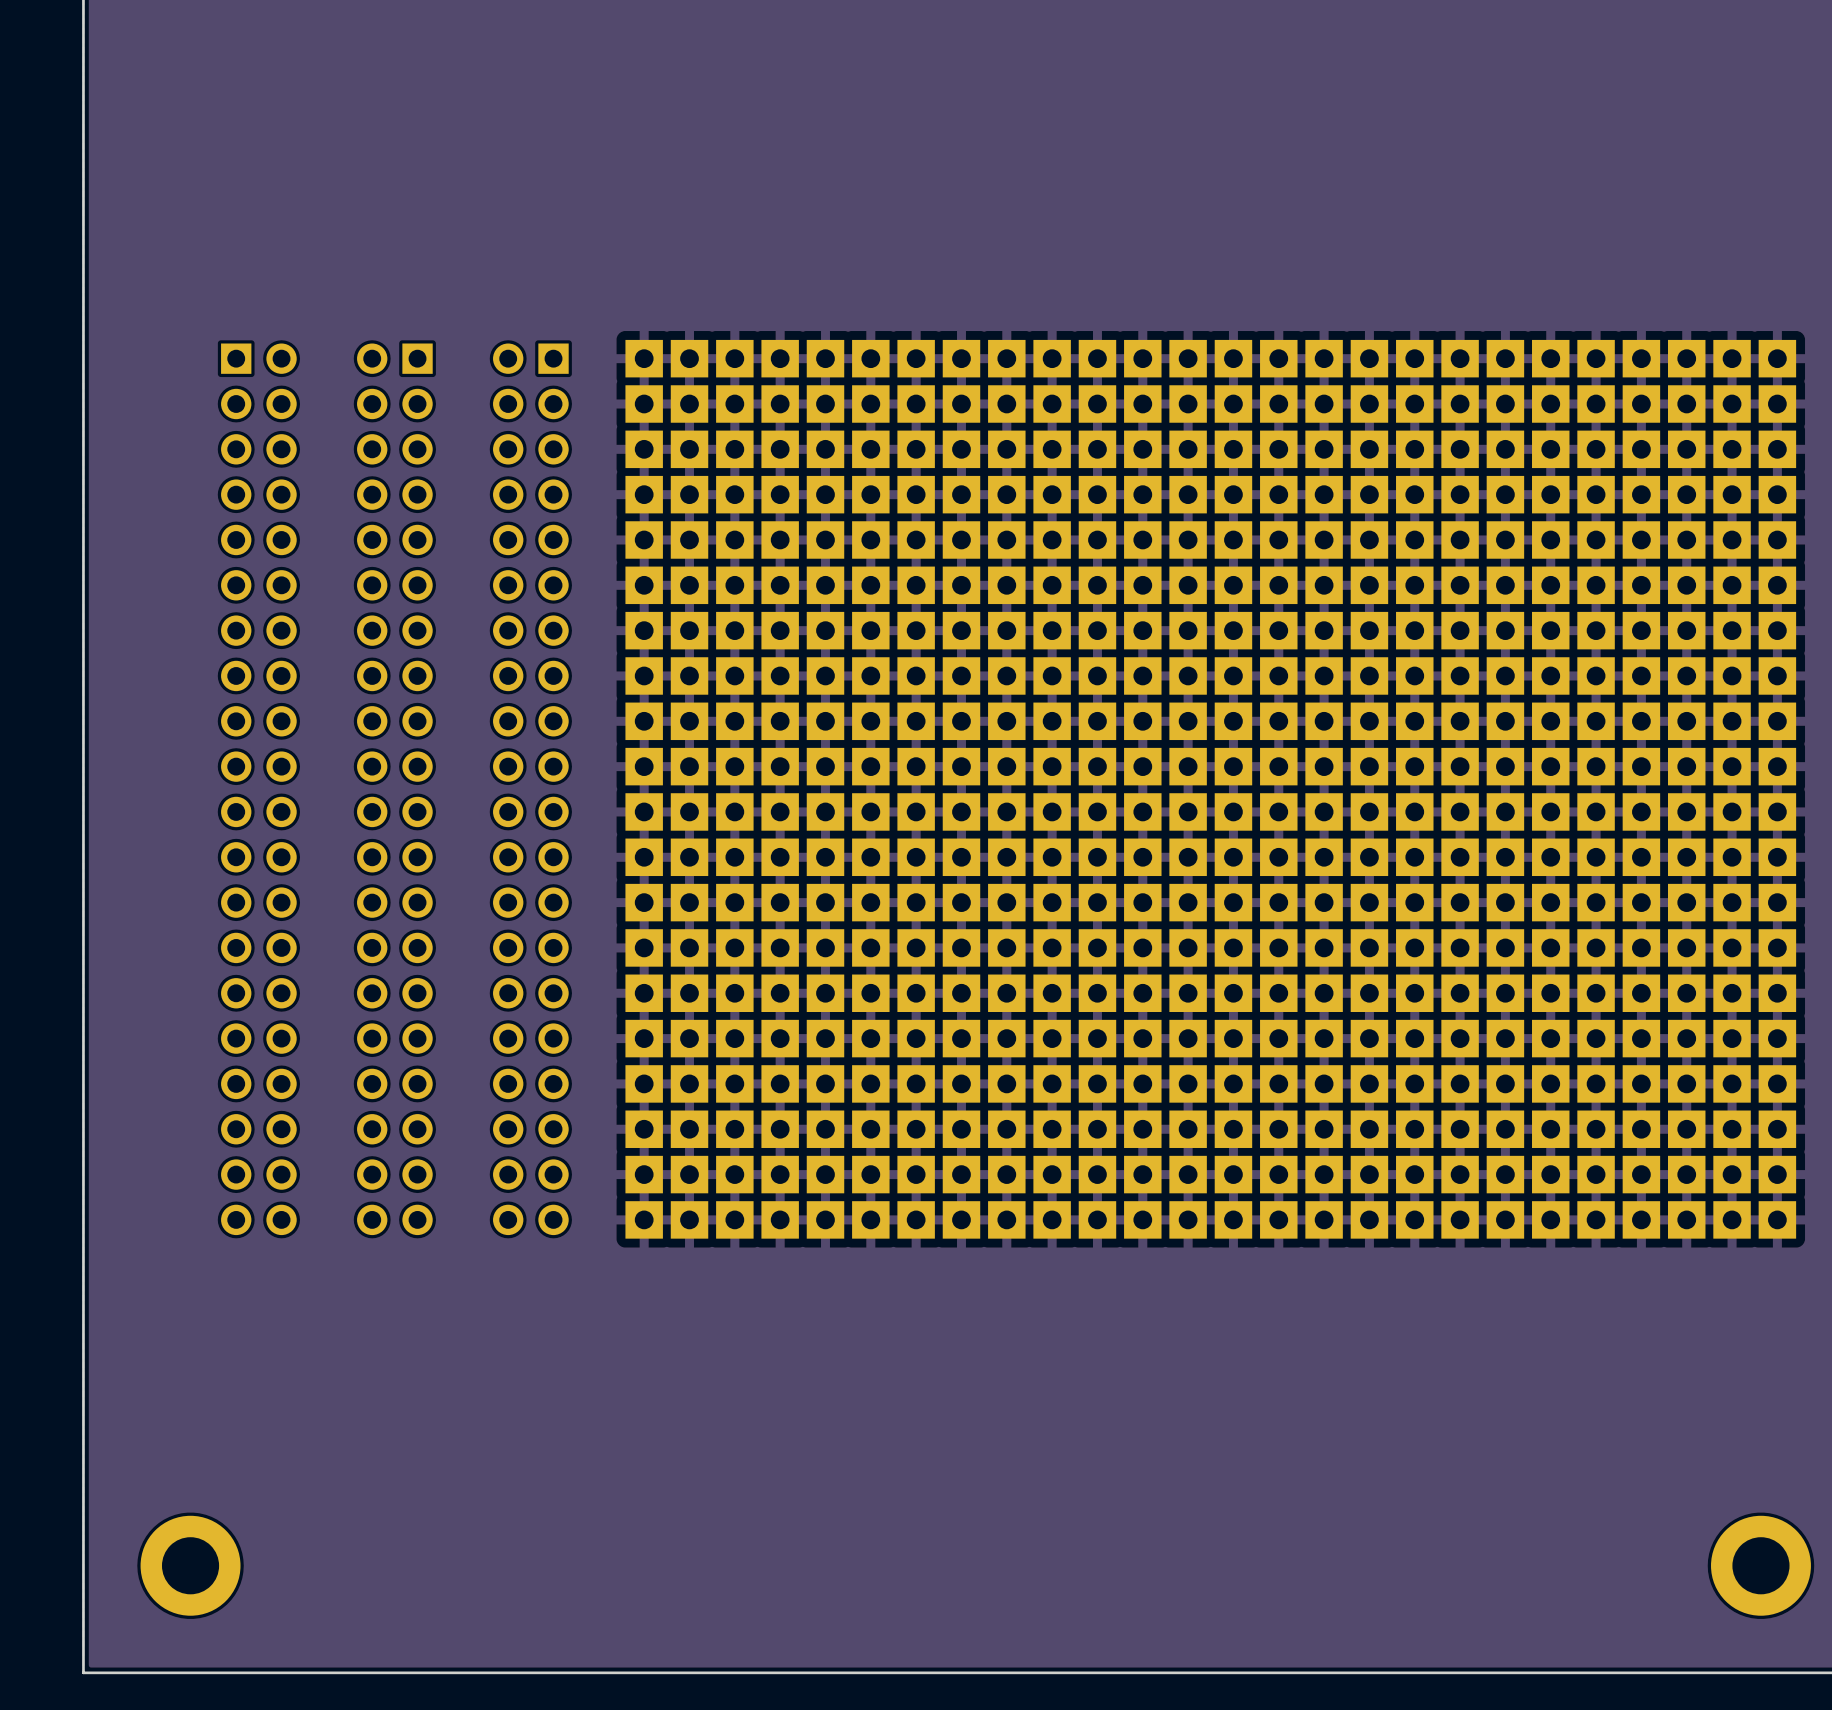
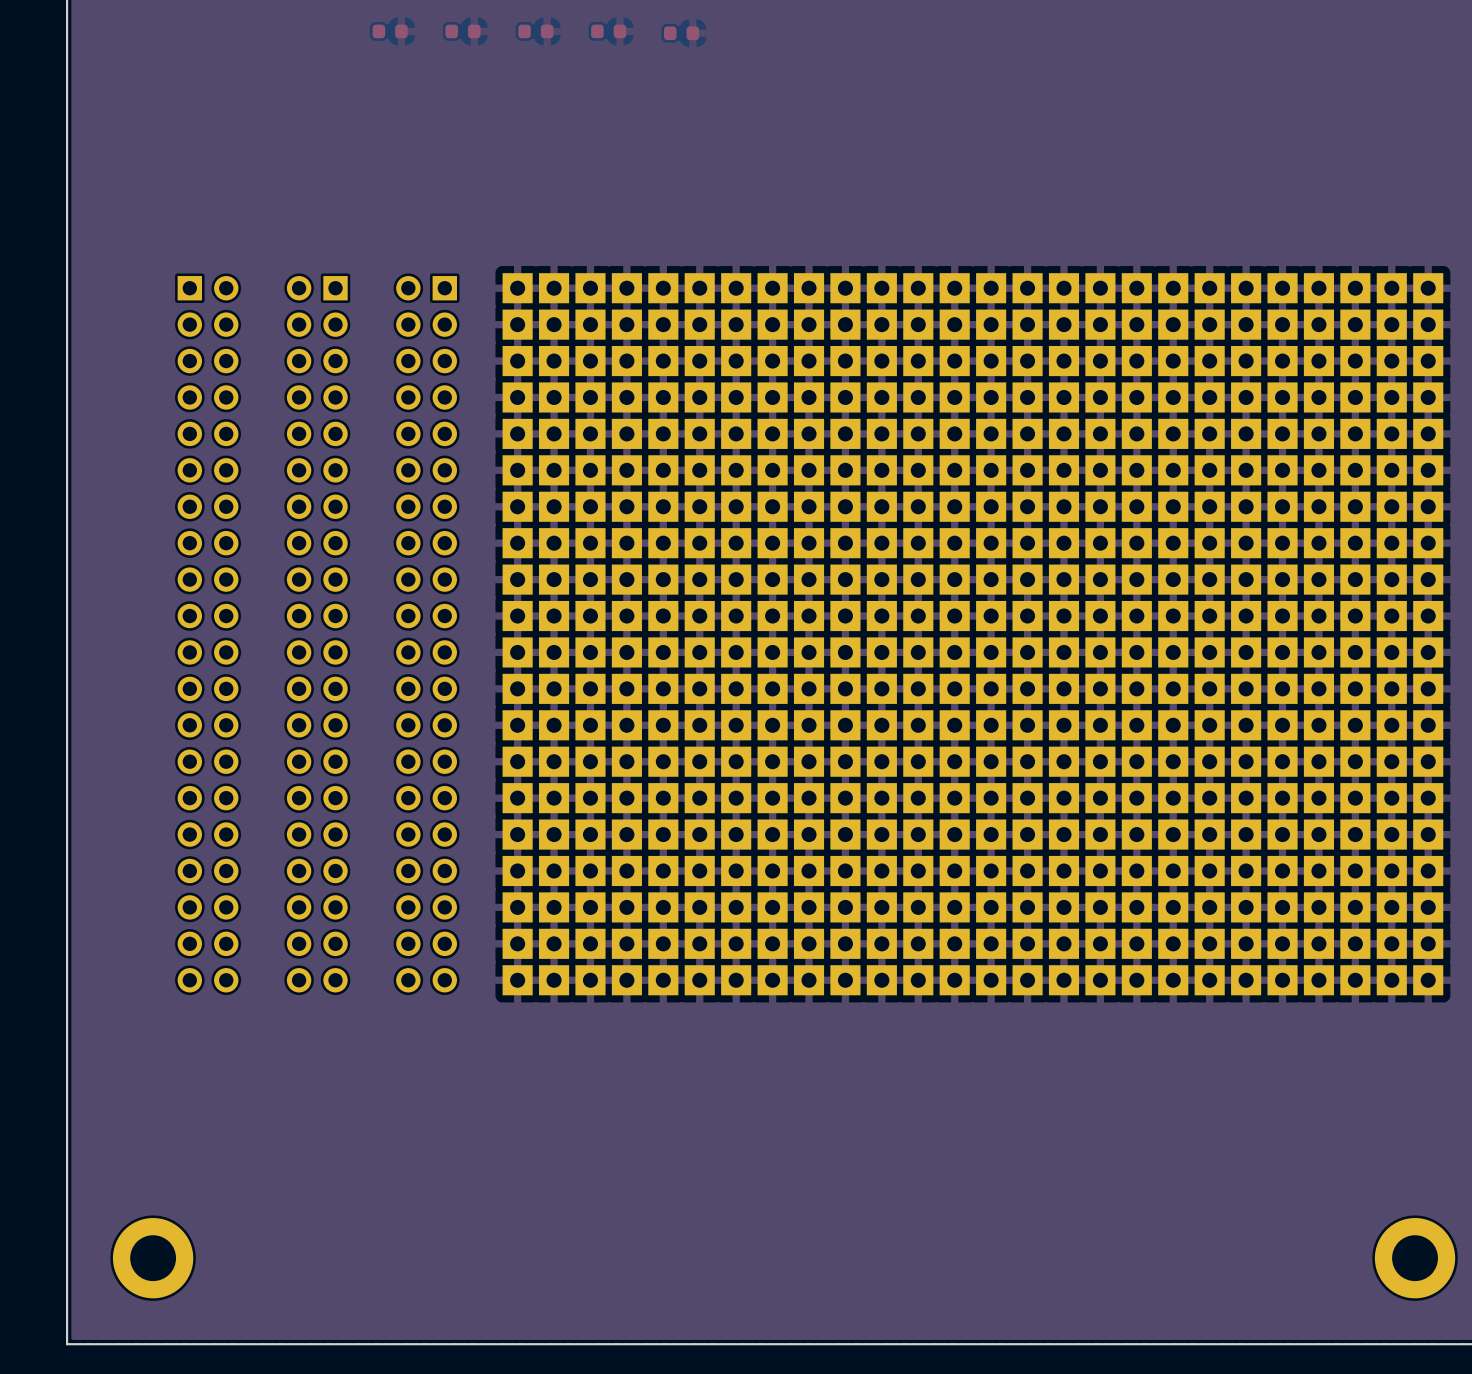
part: none -> (390, 31)
part: none -> (462, 31)
part: none -> (535, 31)
part: none -> (608, 31)
part: none -> (681, 33)

